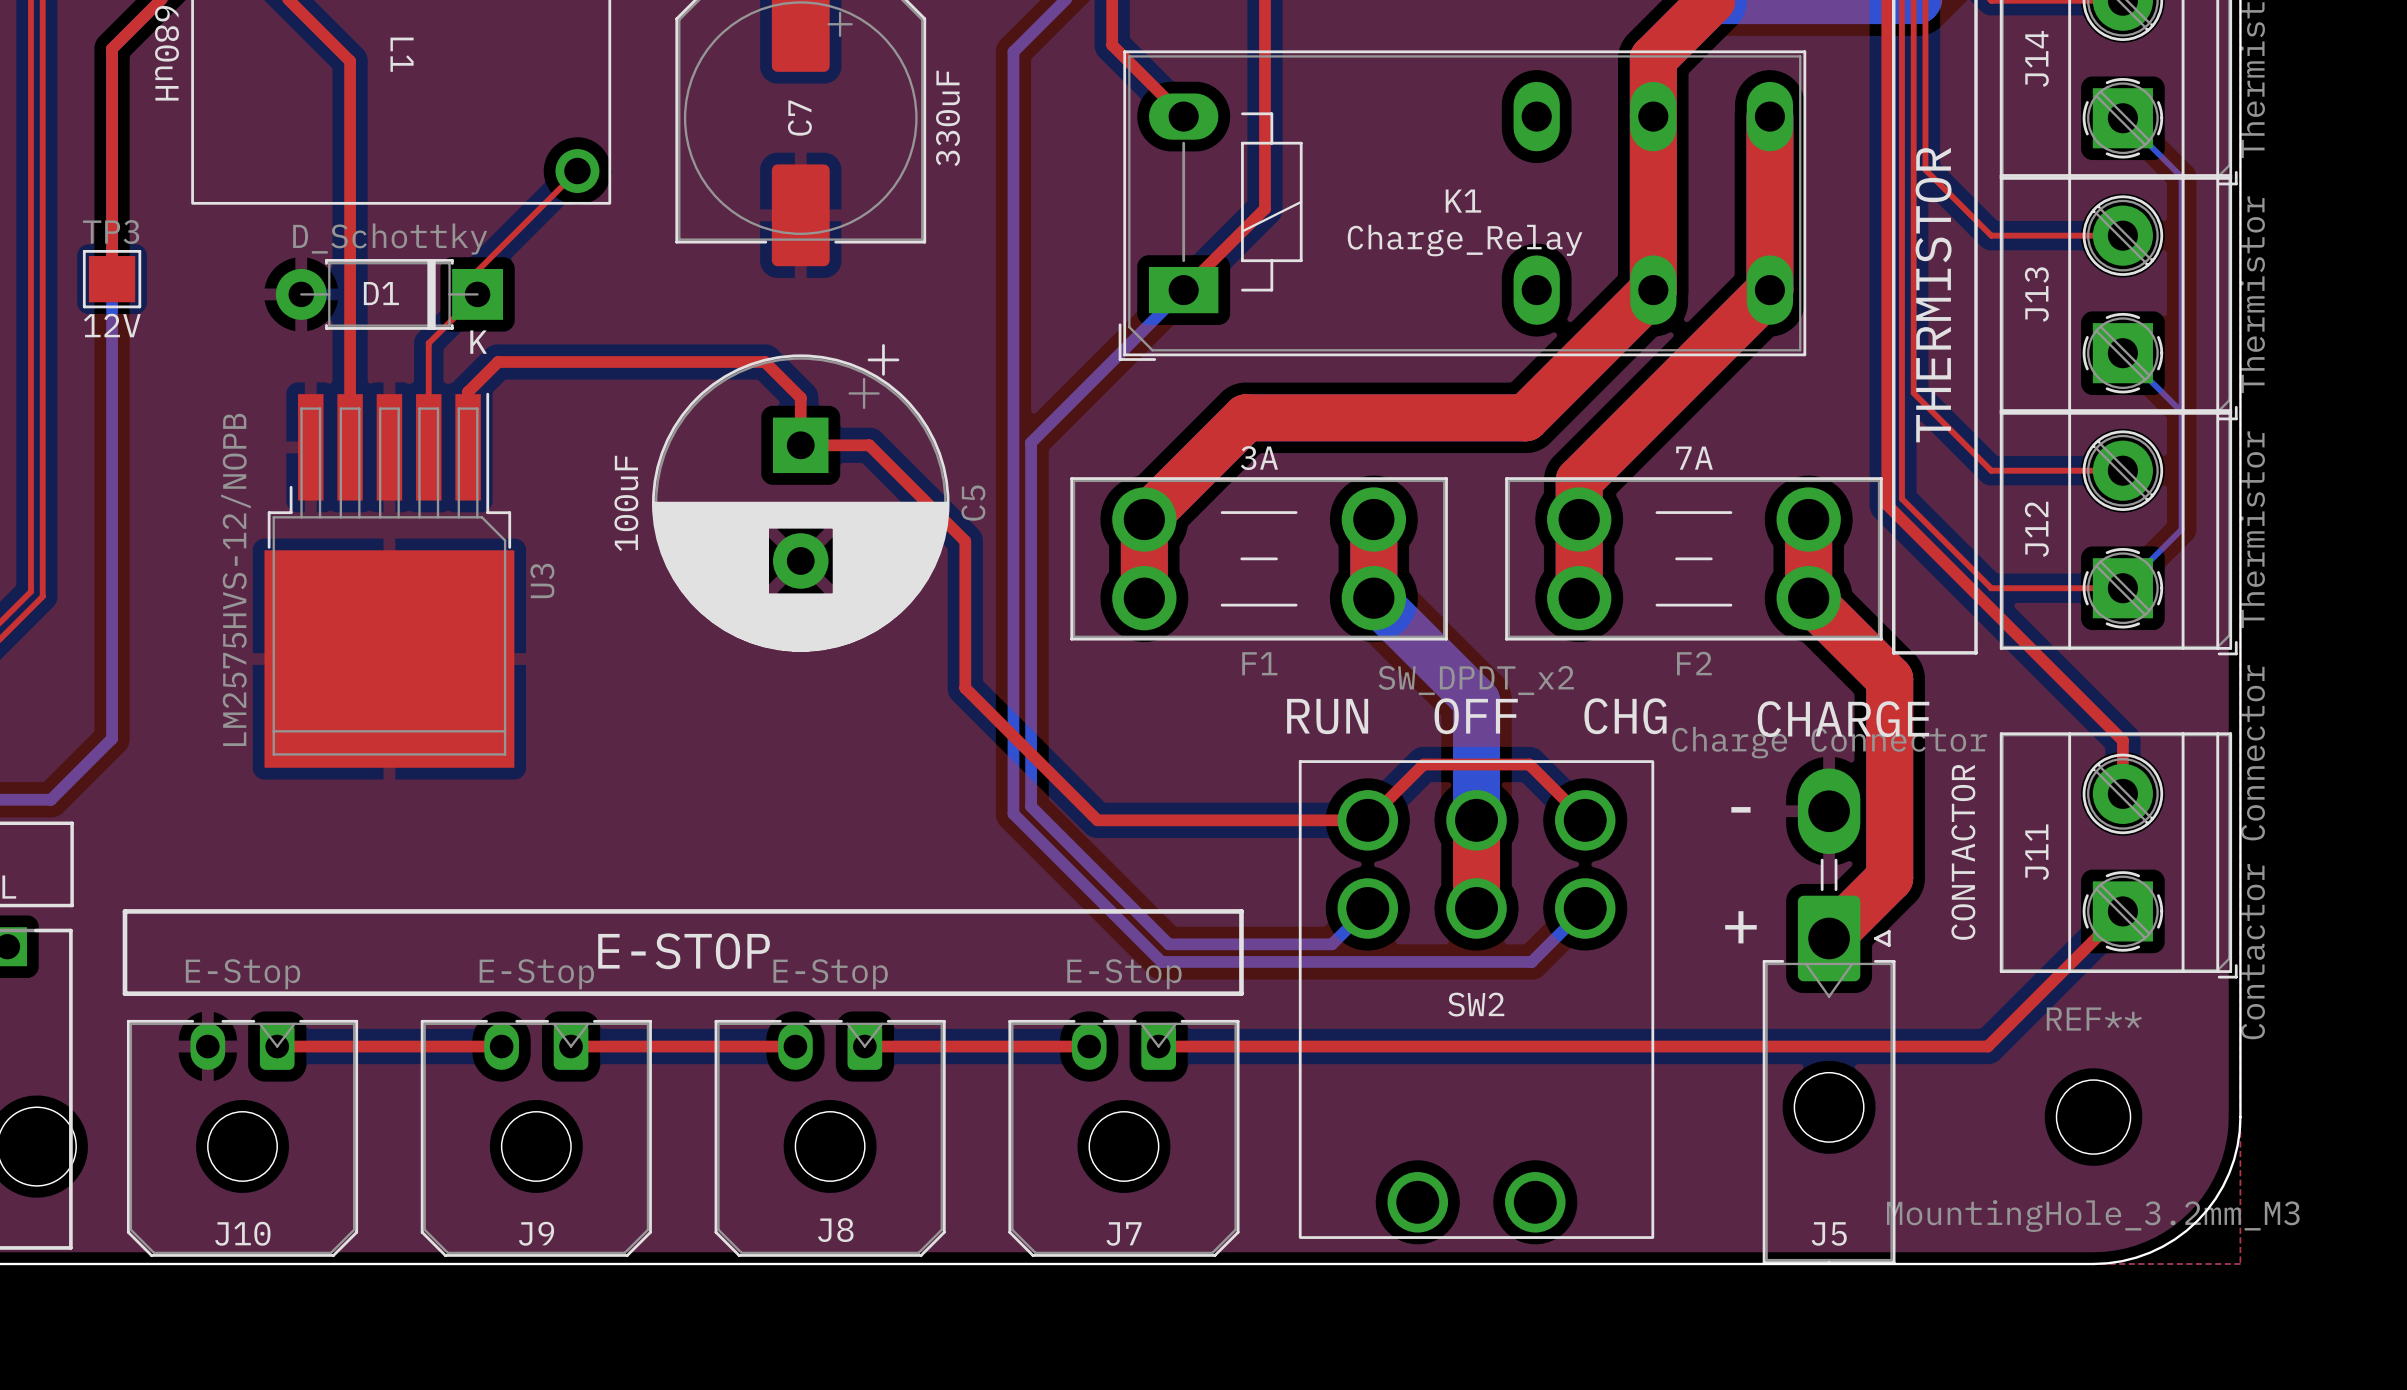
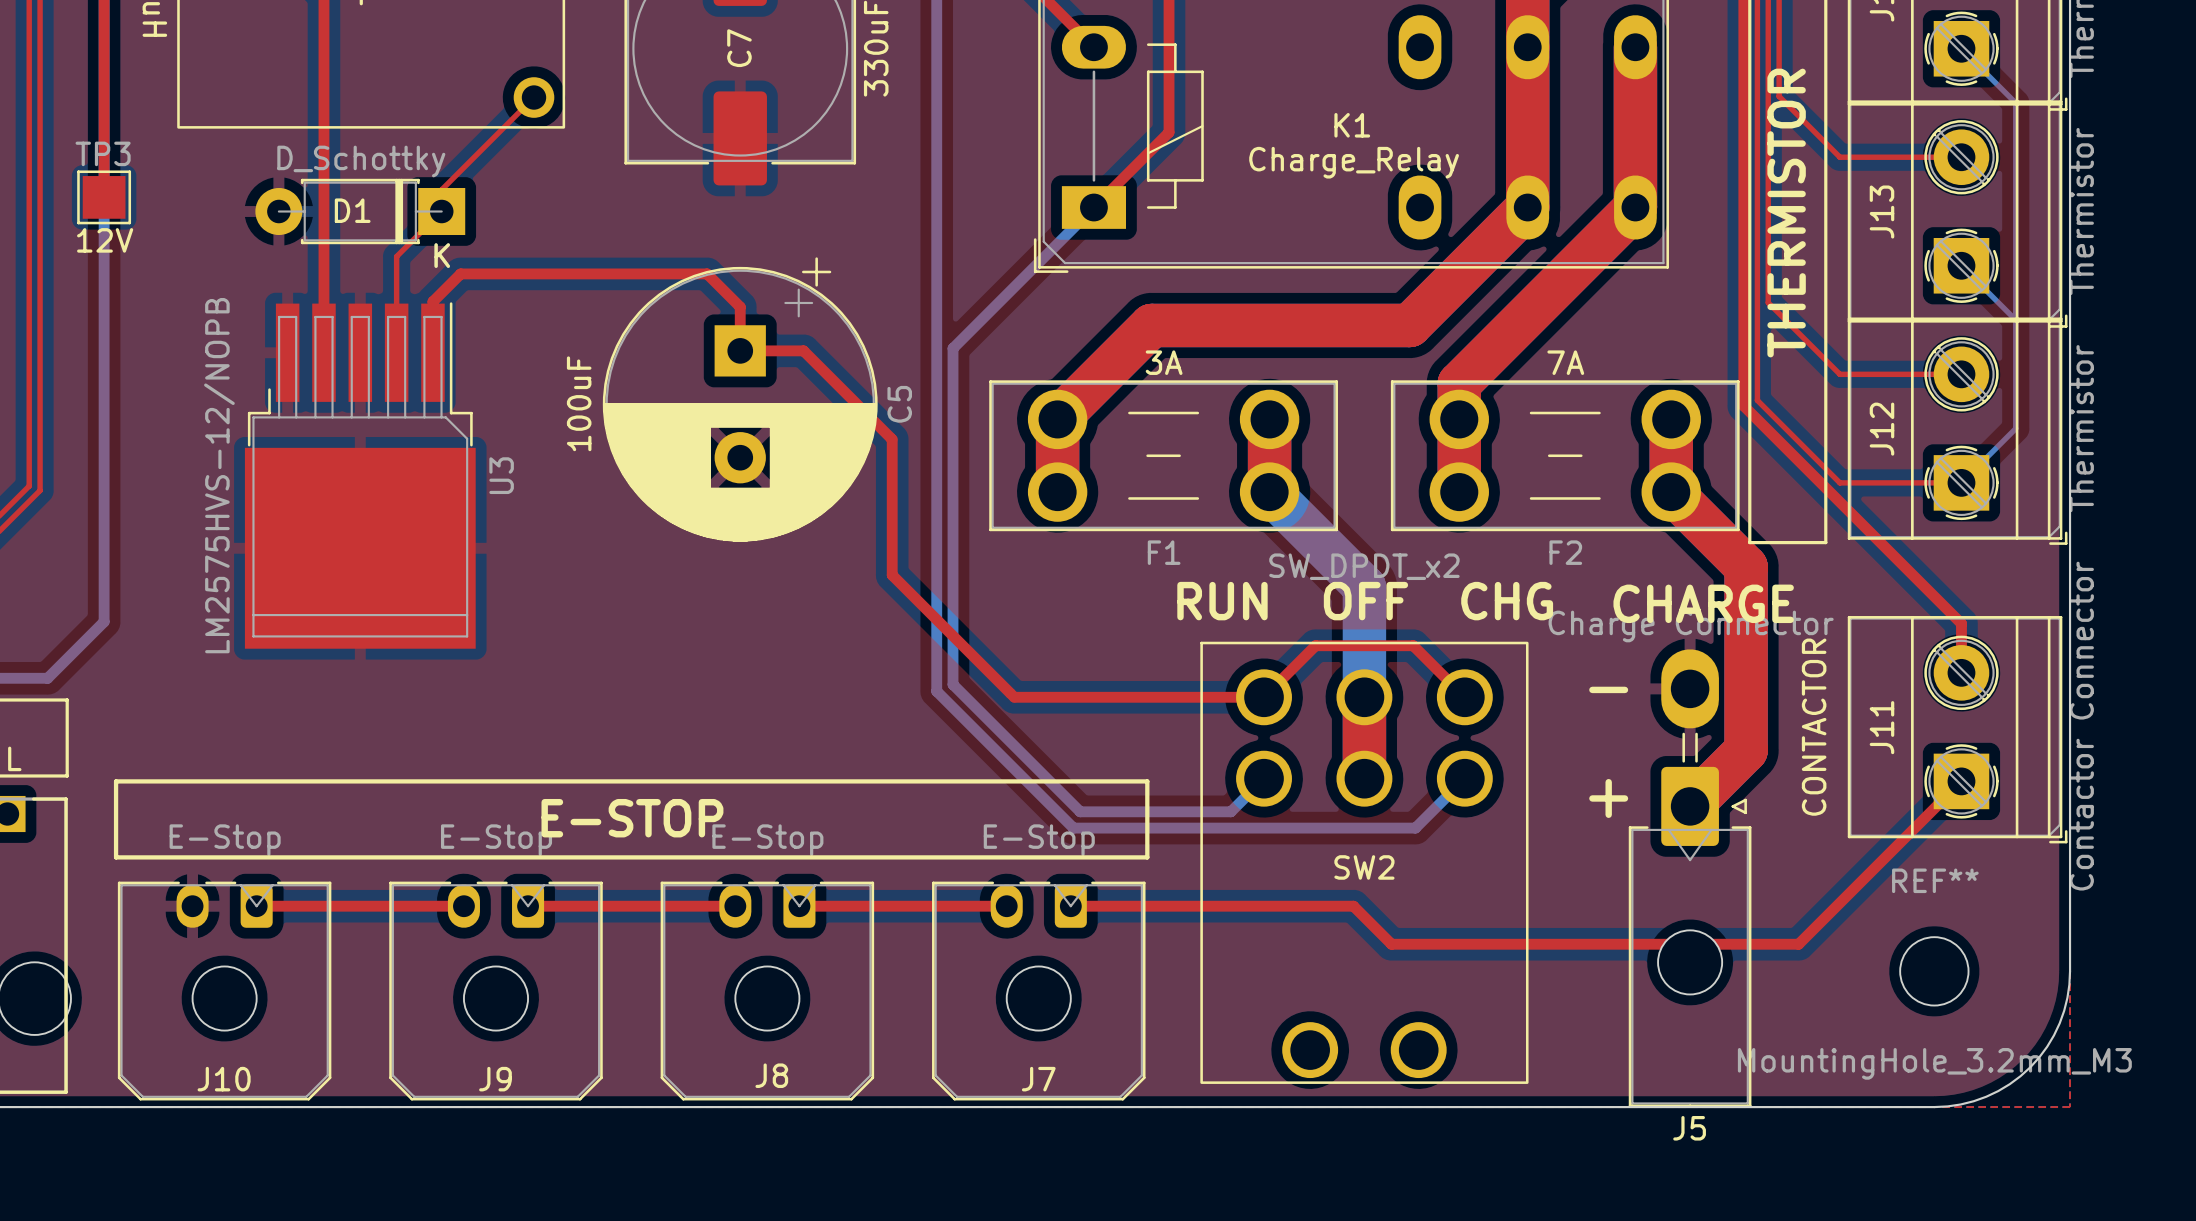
top track: (1464, 1046) (1987, 1046) -> (1353, 906) (1391, 944) (1798, 944) (1836, 906)
J5 name position: J5 (1829, 1233) -> J5 (1689, 1128)

